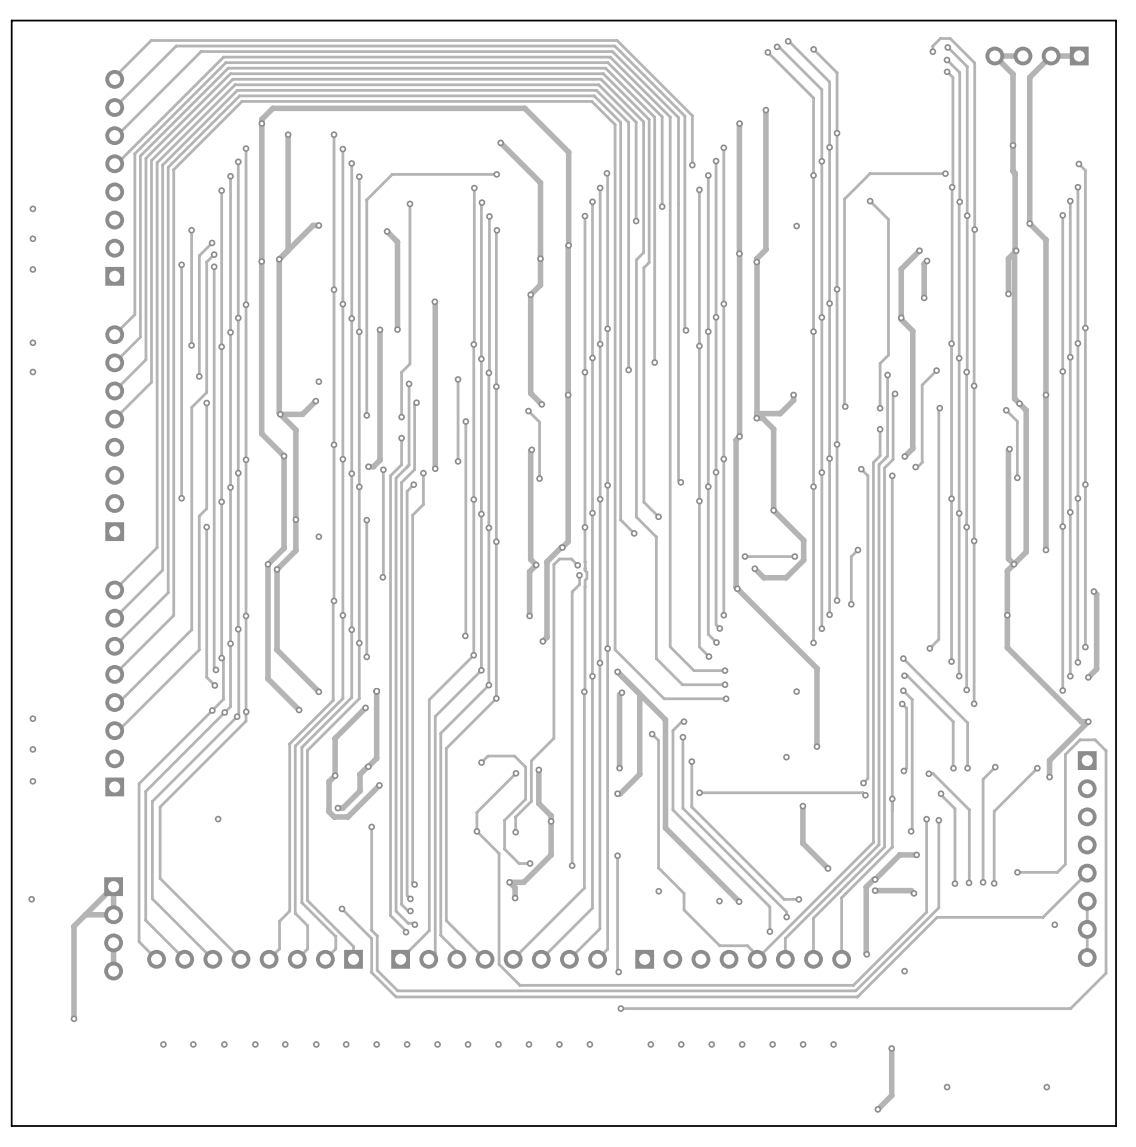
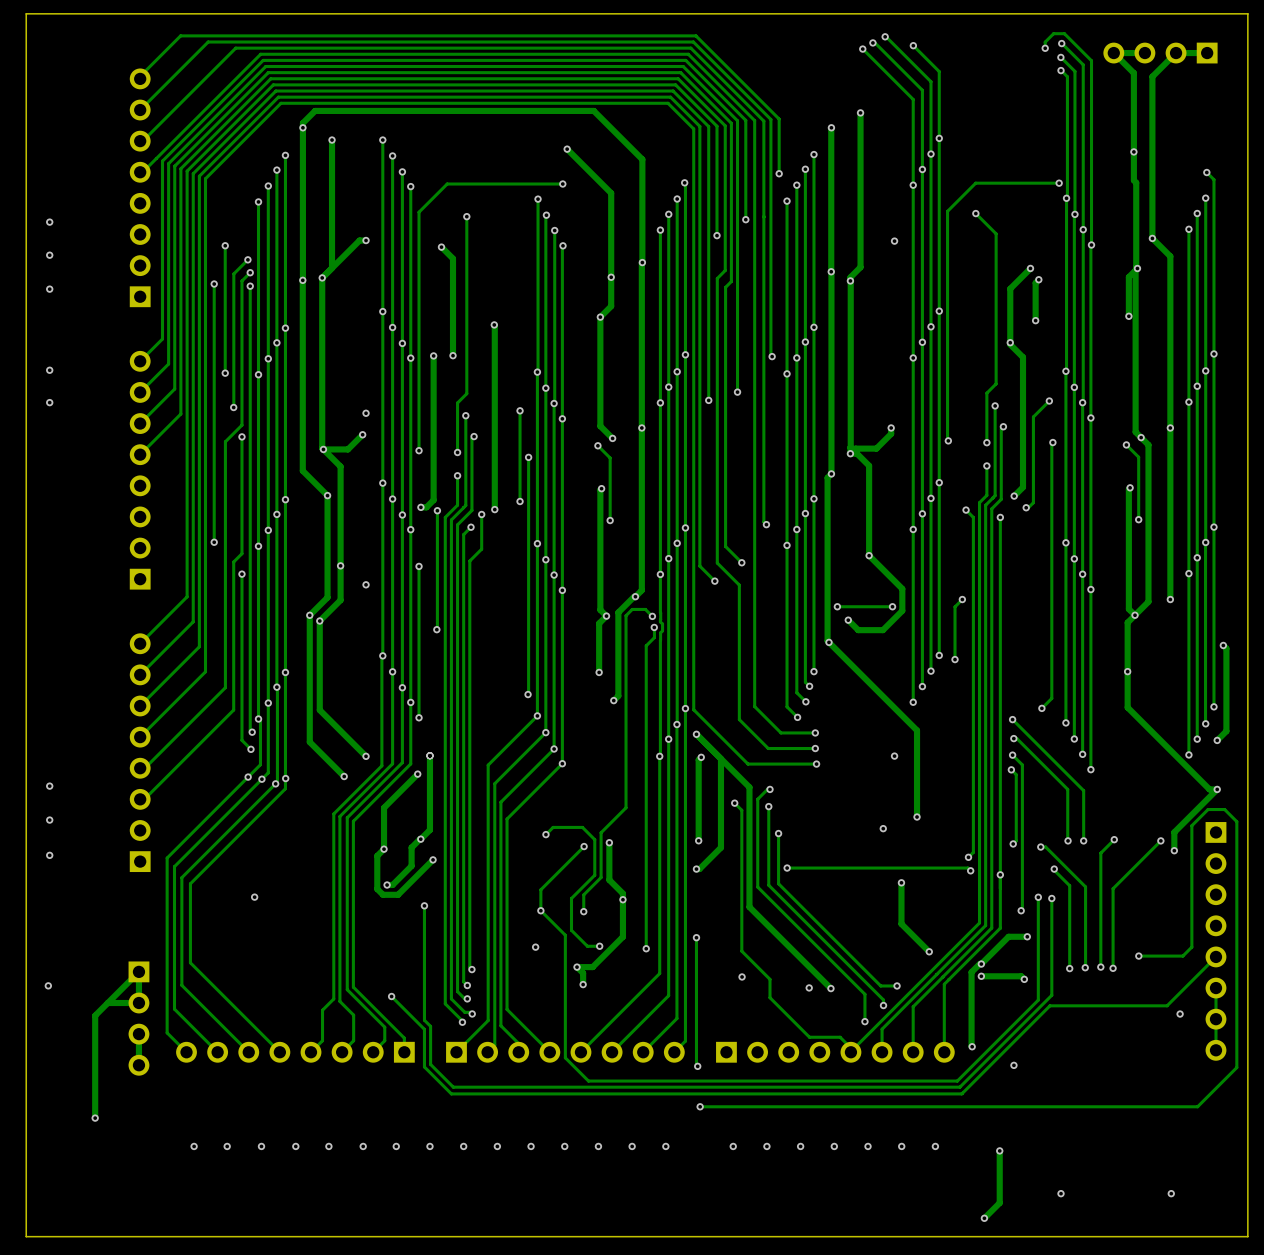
via: none -> (535, 947)

